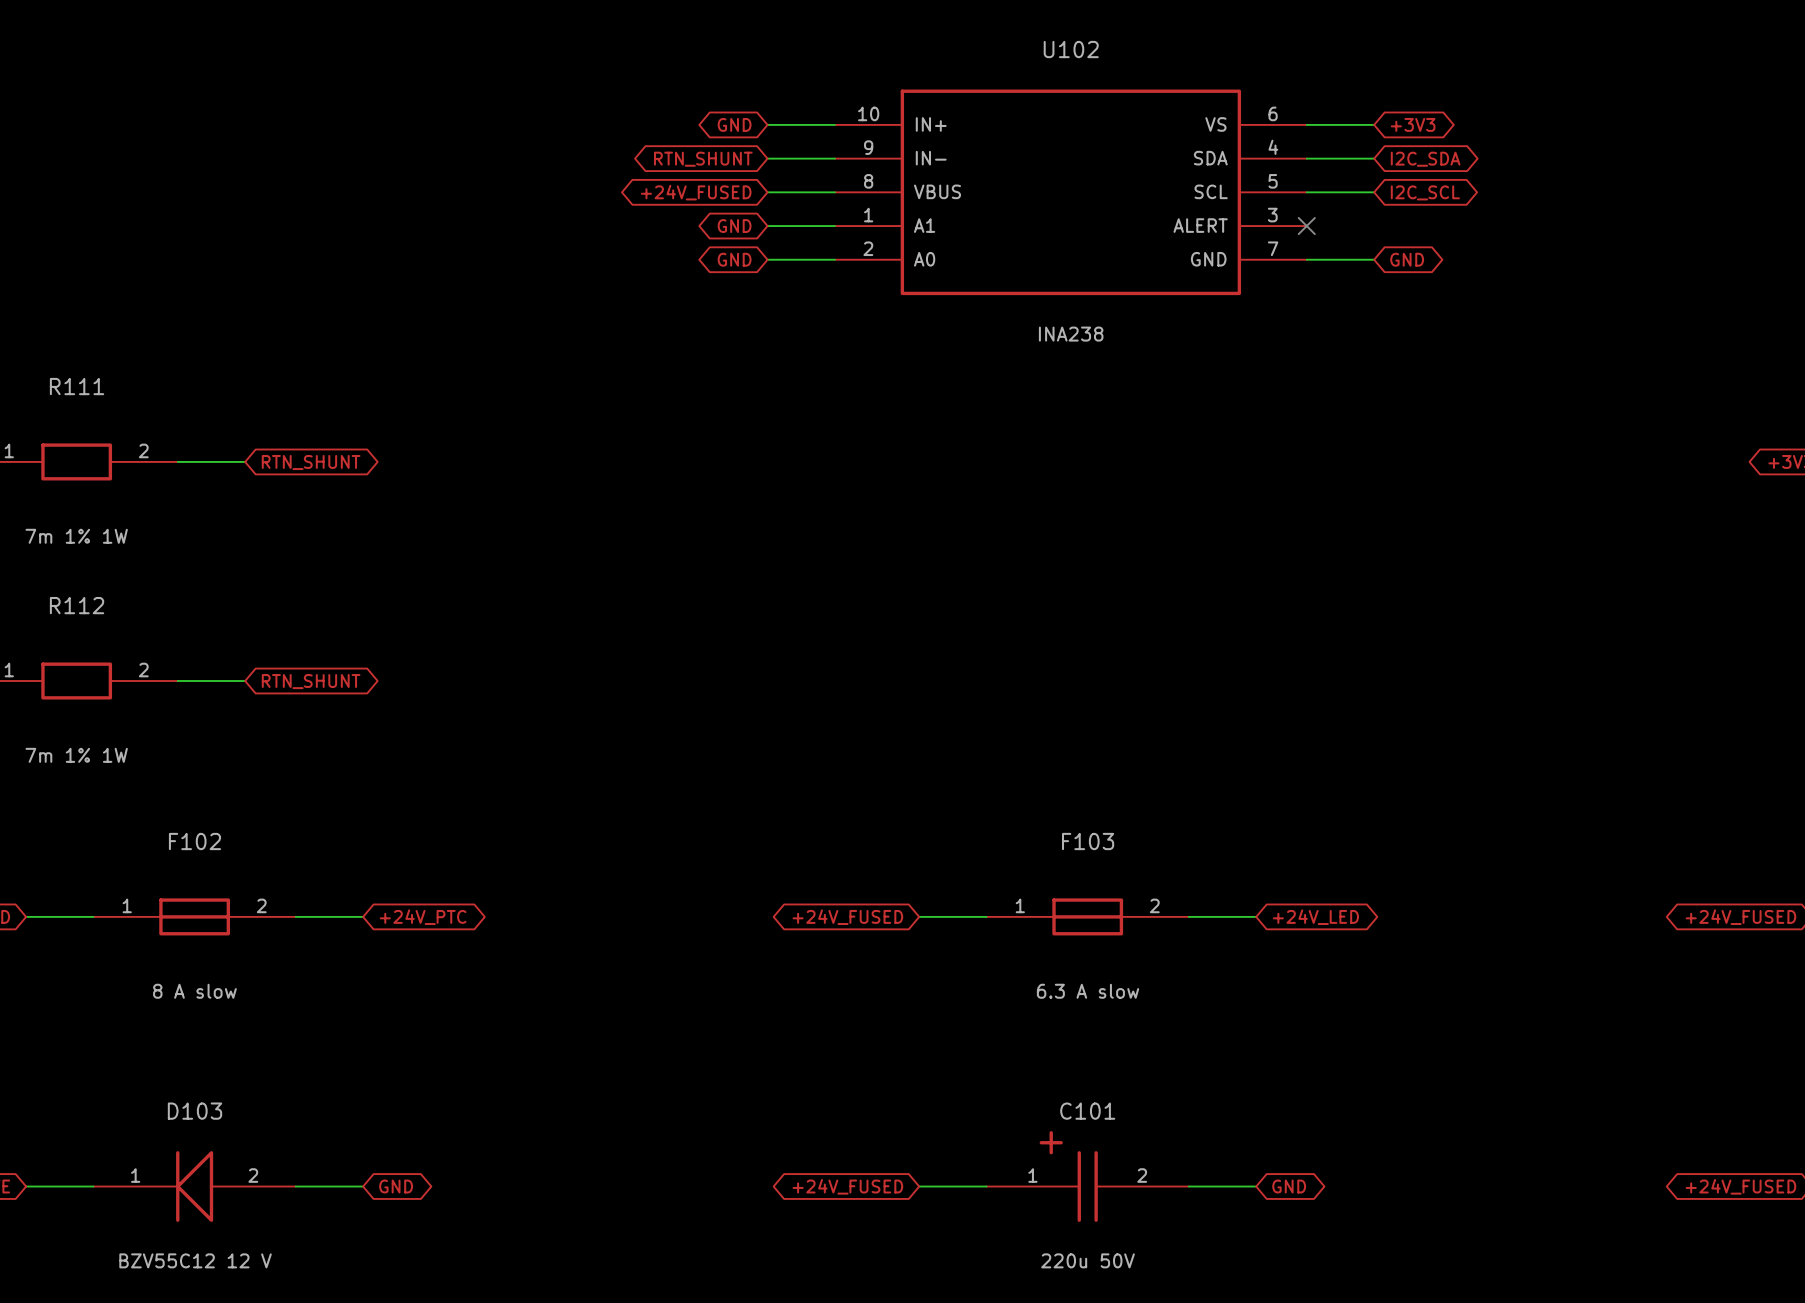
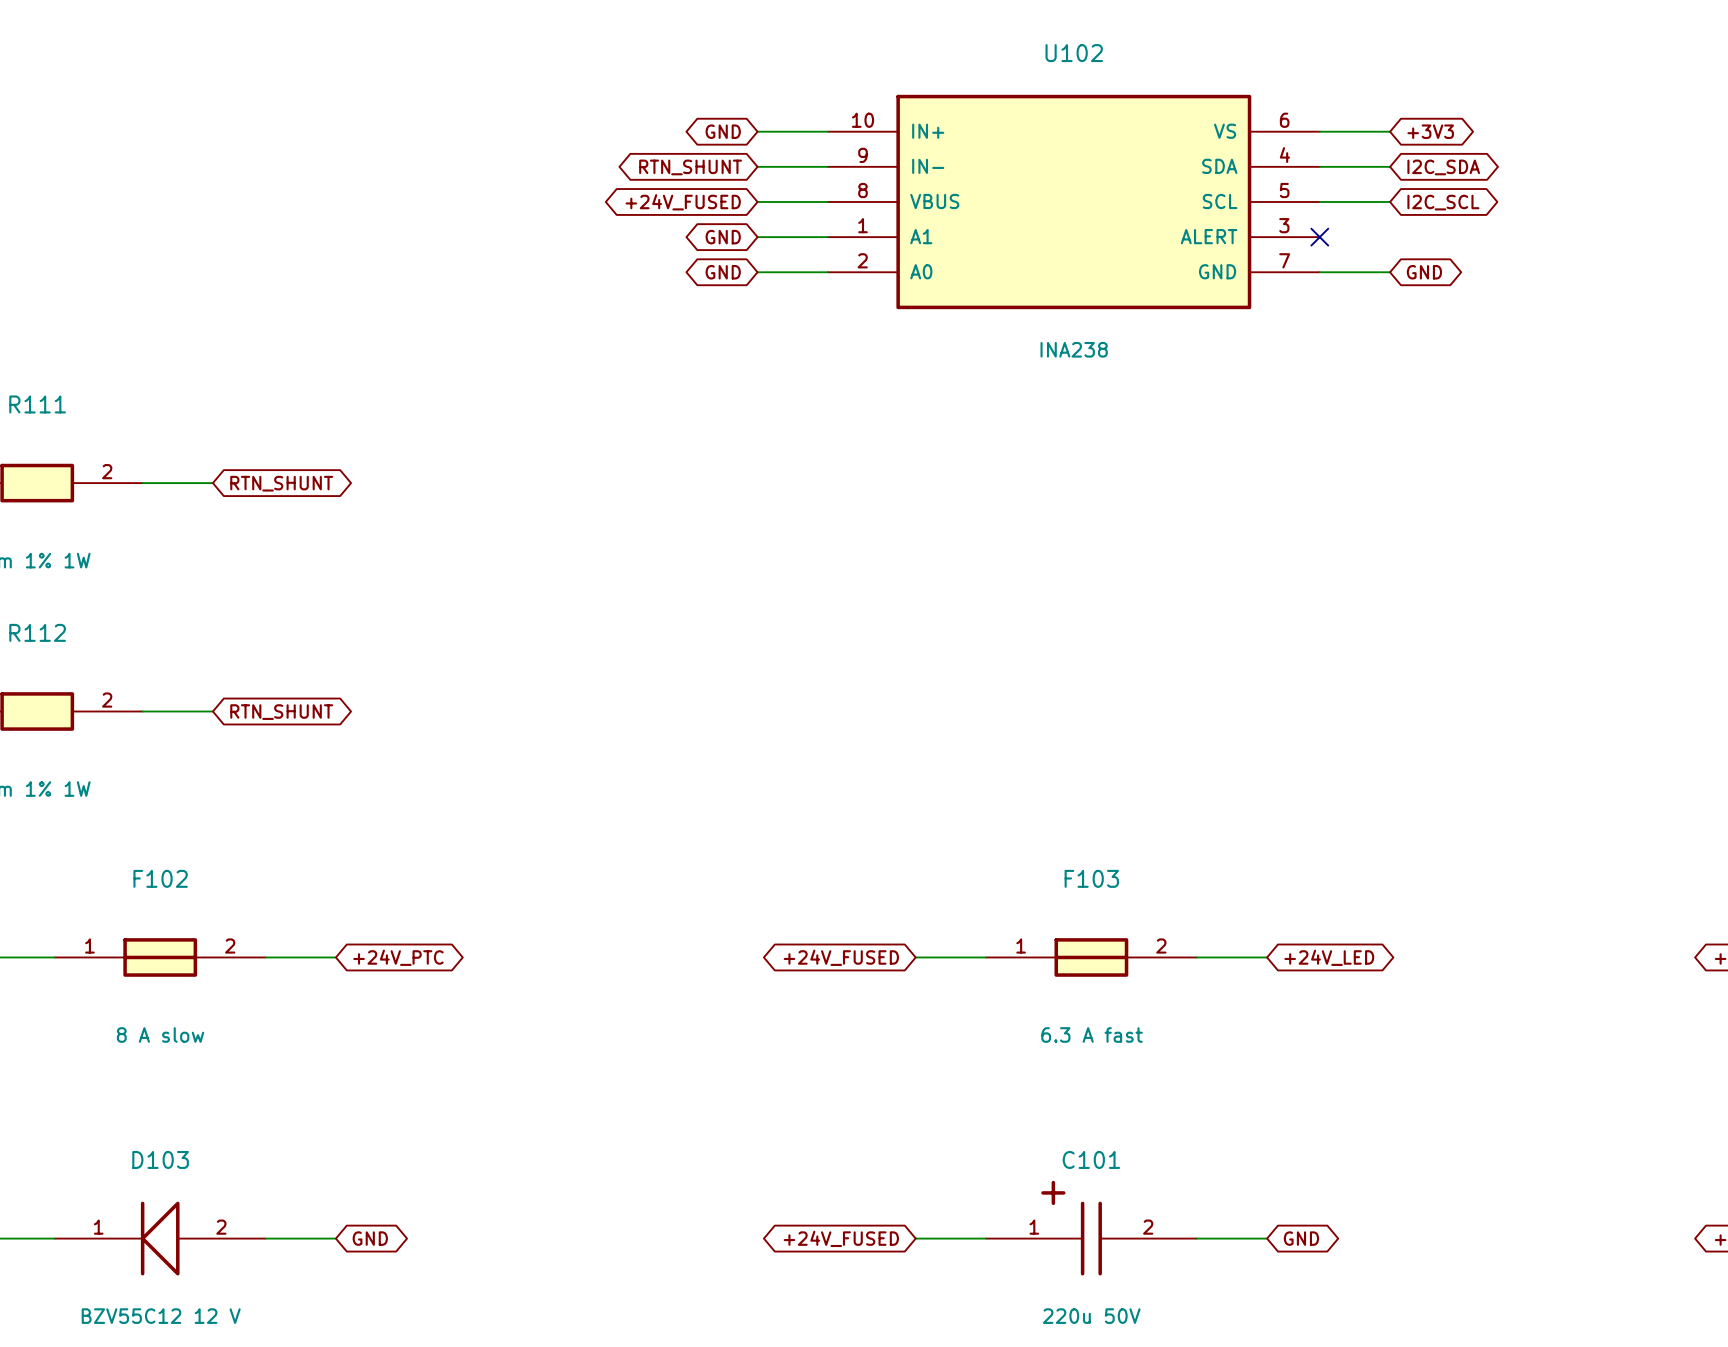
F103 value: 6.3 A slow (1088, 991) -> 6.3 A fast (1092, 1034)

